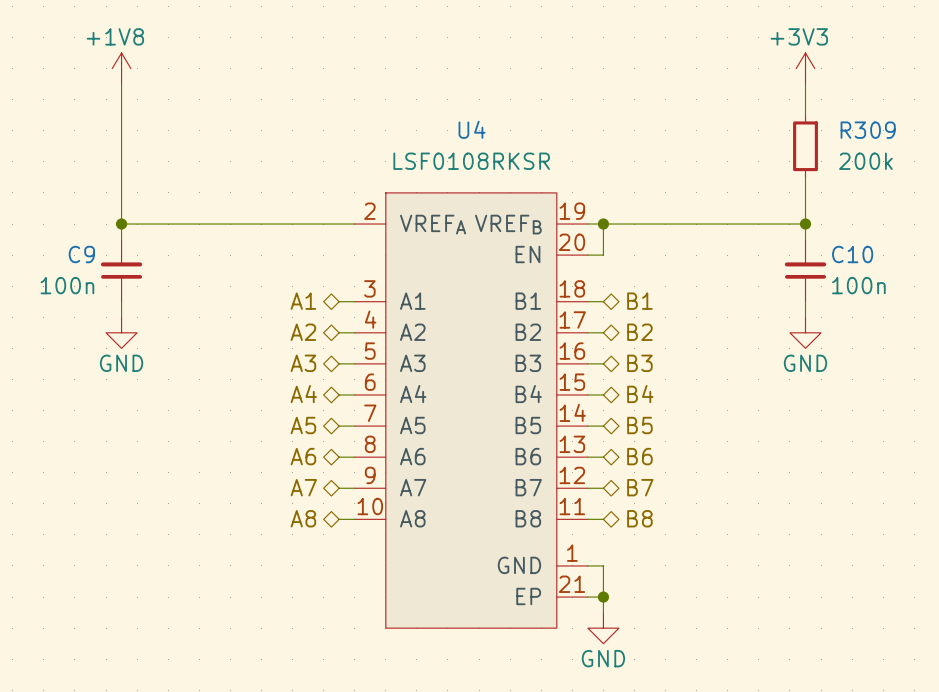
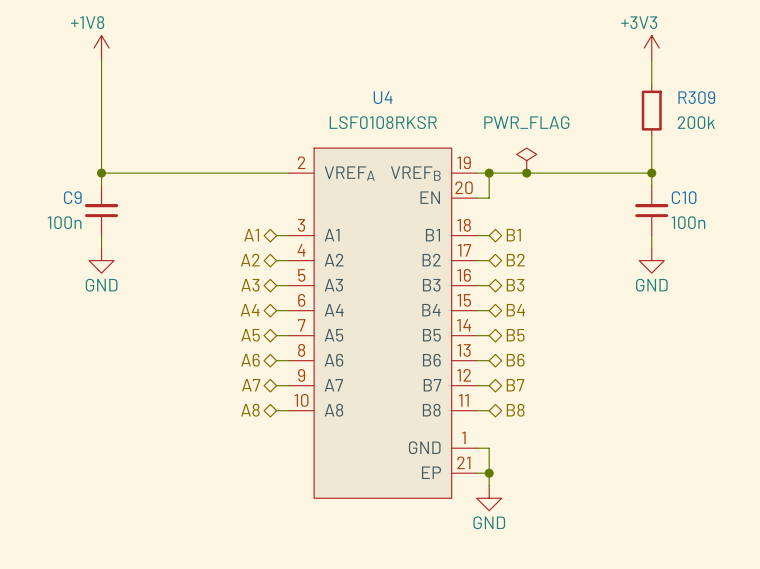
power symbol: none -> PWR_FLAG (526, 160)
junction: none -> (526, 173)

